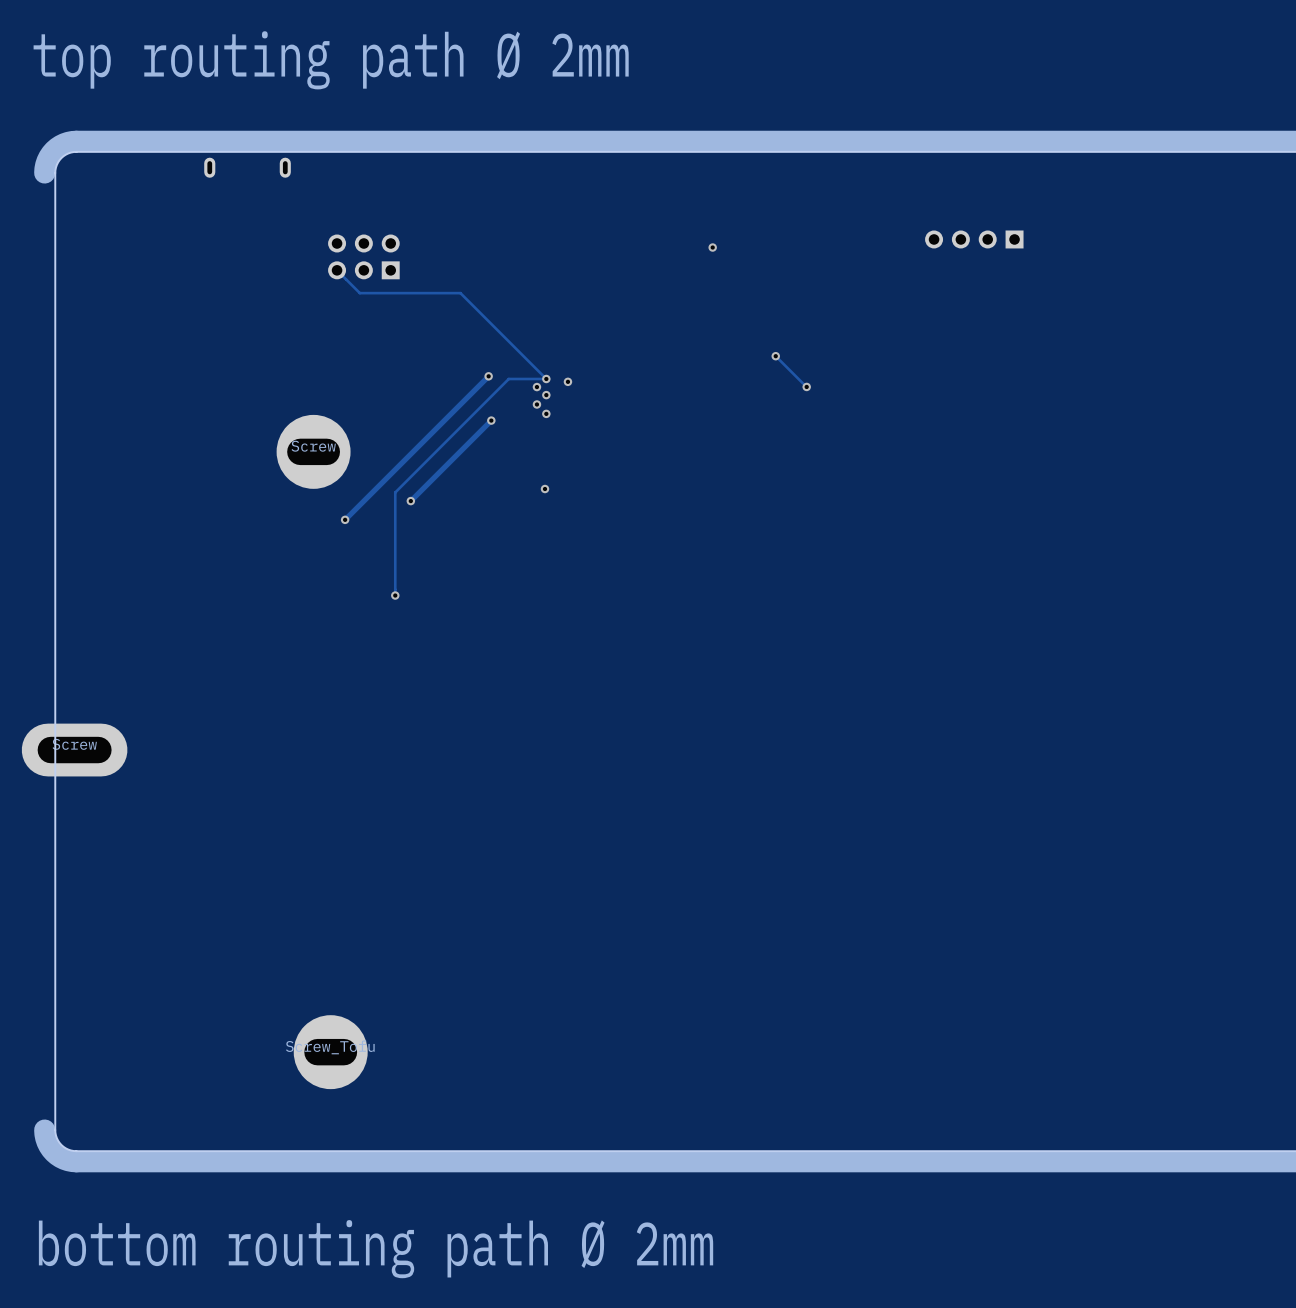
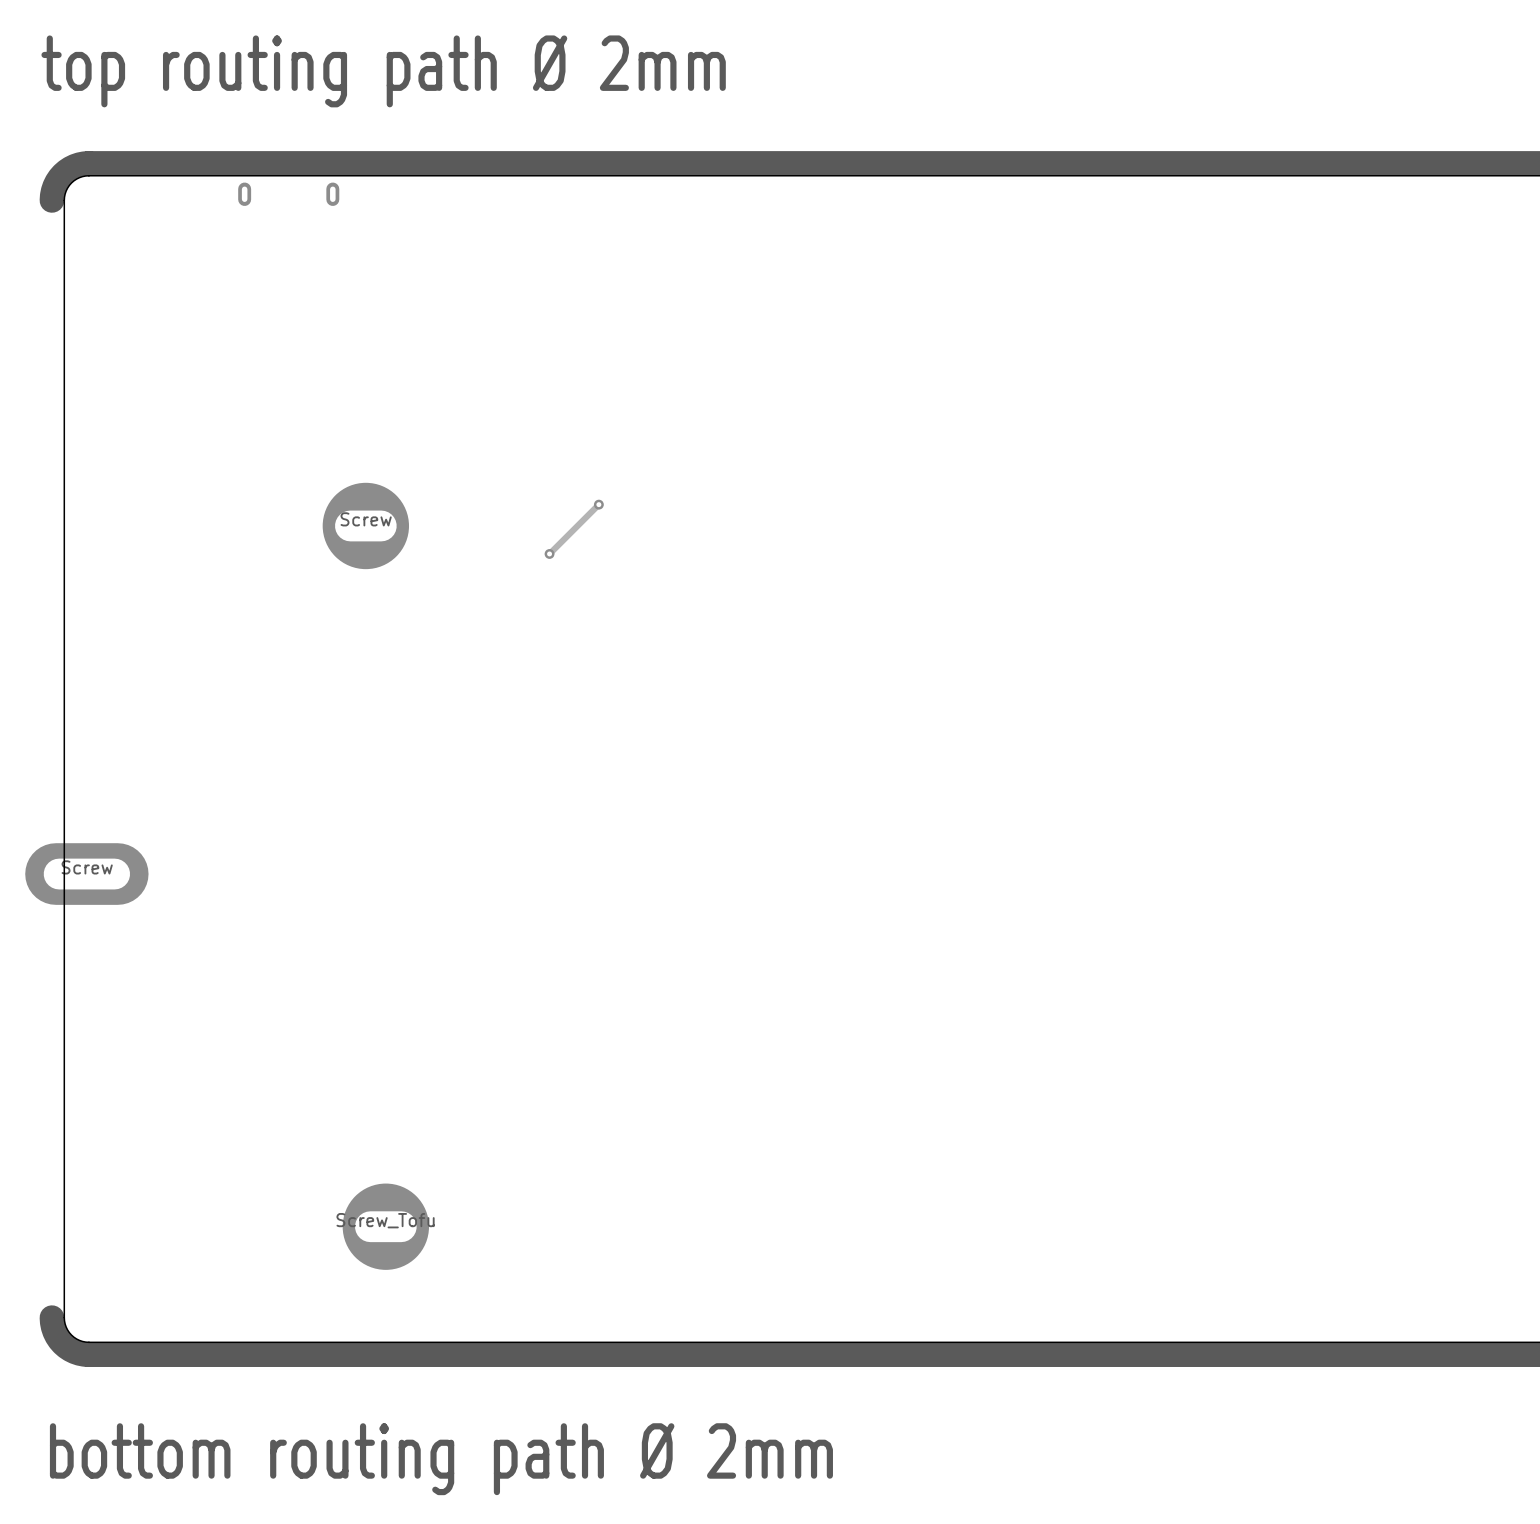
part: (974, 239) -> none
via: (712, 247) -> none
part: (363, 256) -> none
track: (337, 270) (359, 293) (460, 293) (546, 378) (508, 378) (395, 492) (395, 595) -> none
track: (775, 356) (806, 386) -> none
via: (775, 356) -> none
track: (488, 376) (345, 519) -> none
via: (488, 376) -> none
via: (546, 378) -> none
via: (567, 381) -> none
via: (806, 386) -> none
via: (536, 387) -> none
via: (546, 395) -> none
via: (536, 404) -> none
via: (546, 413) -> none
track: (491, 420) (410, 501) -> none
via: (491, 420) -> none
track: none -> (598, 504) (549, 553)
via: none -> (598, 504)
via: none -> (549, 553)
via: (545, 489) -> none
via: (410, 501) -> none
via: (345, 519) -> none
via: (395, 595) -> none

